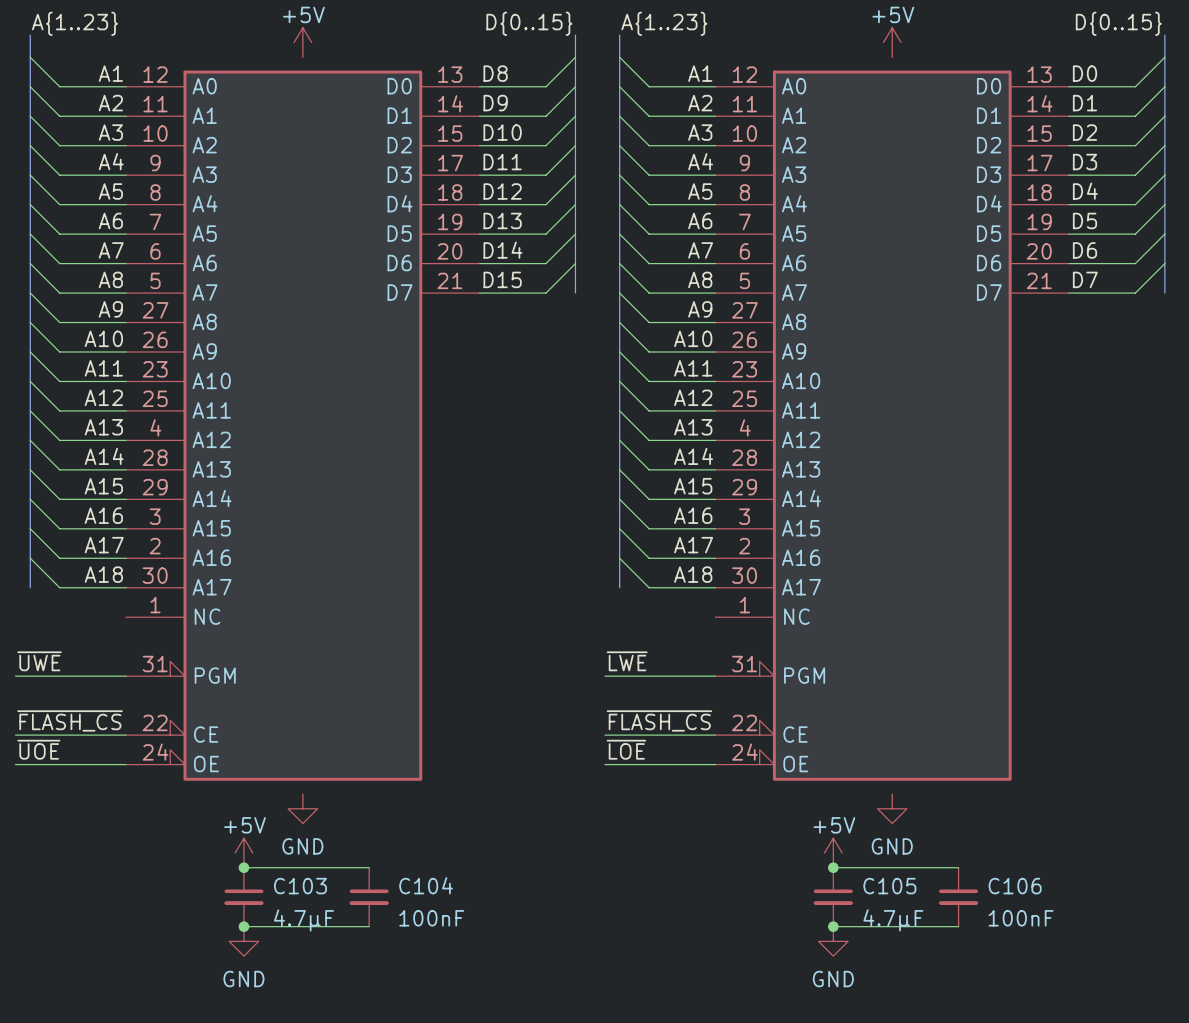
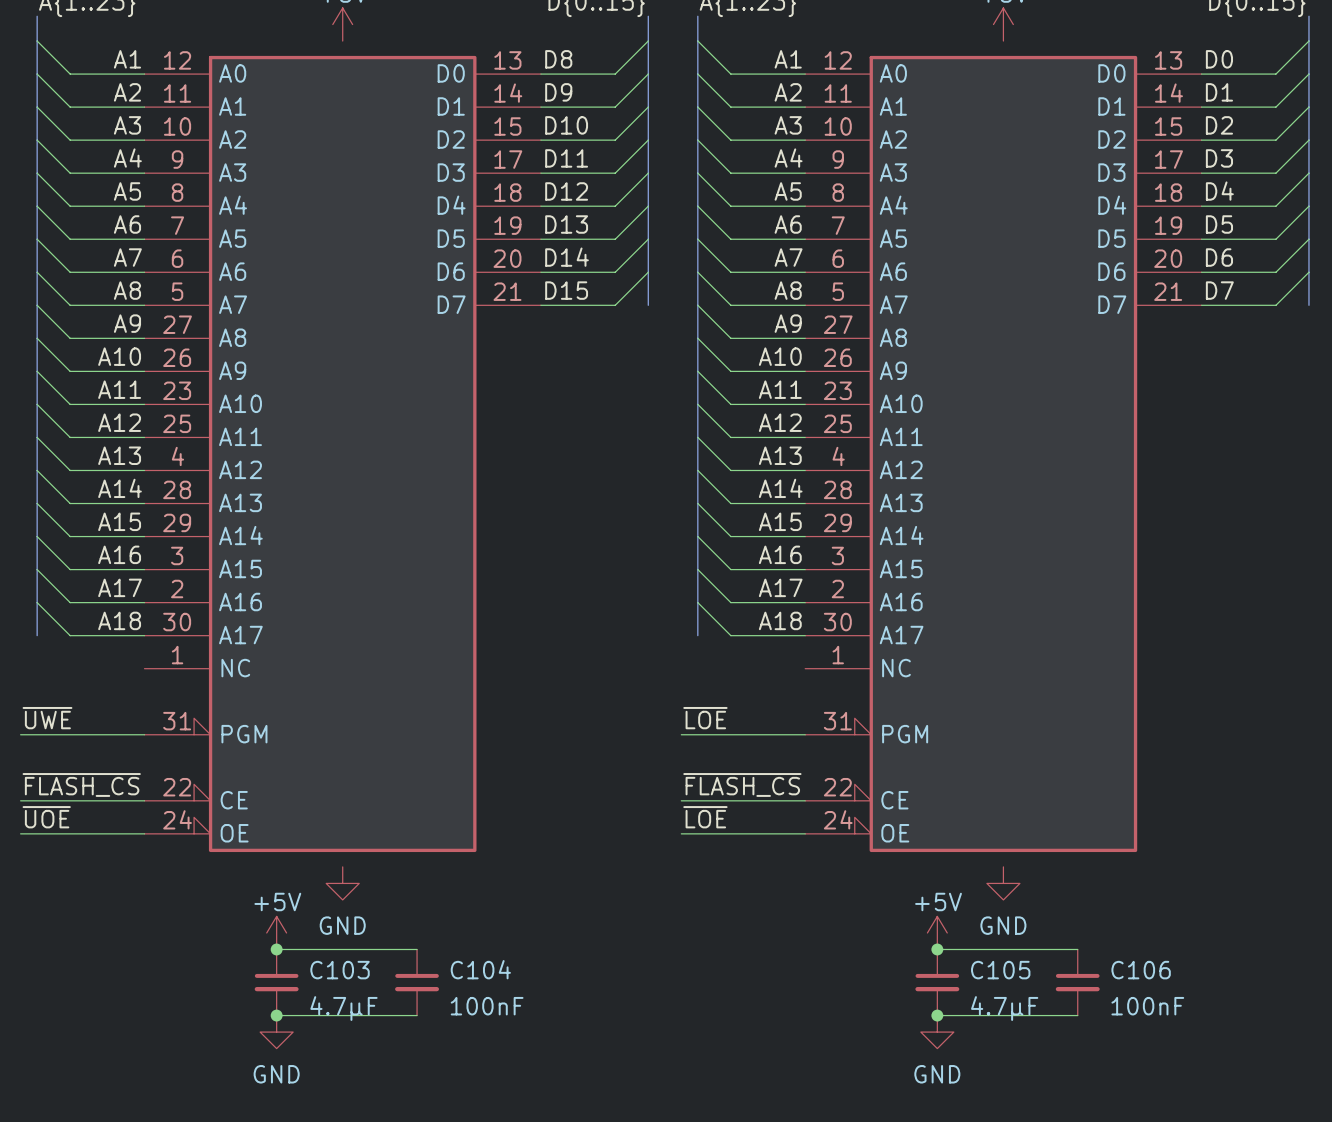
label: ~{LWE} (627, 661) -> ~{LOE} (705, 718)

